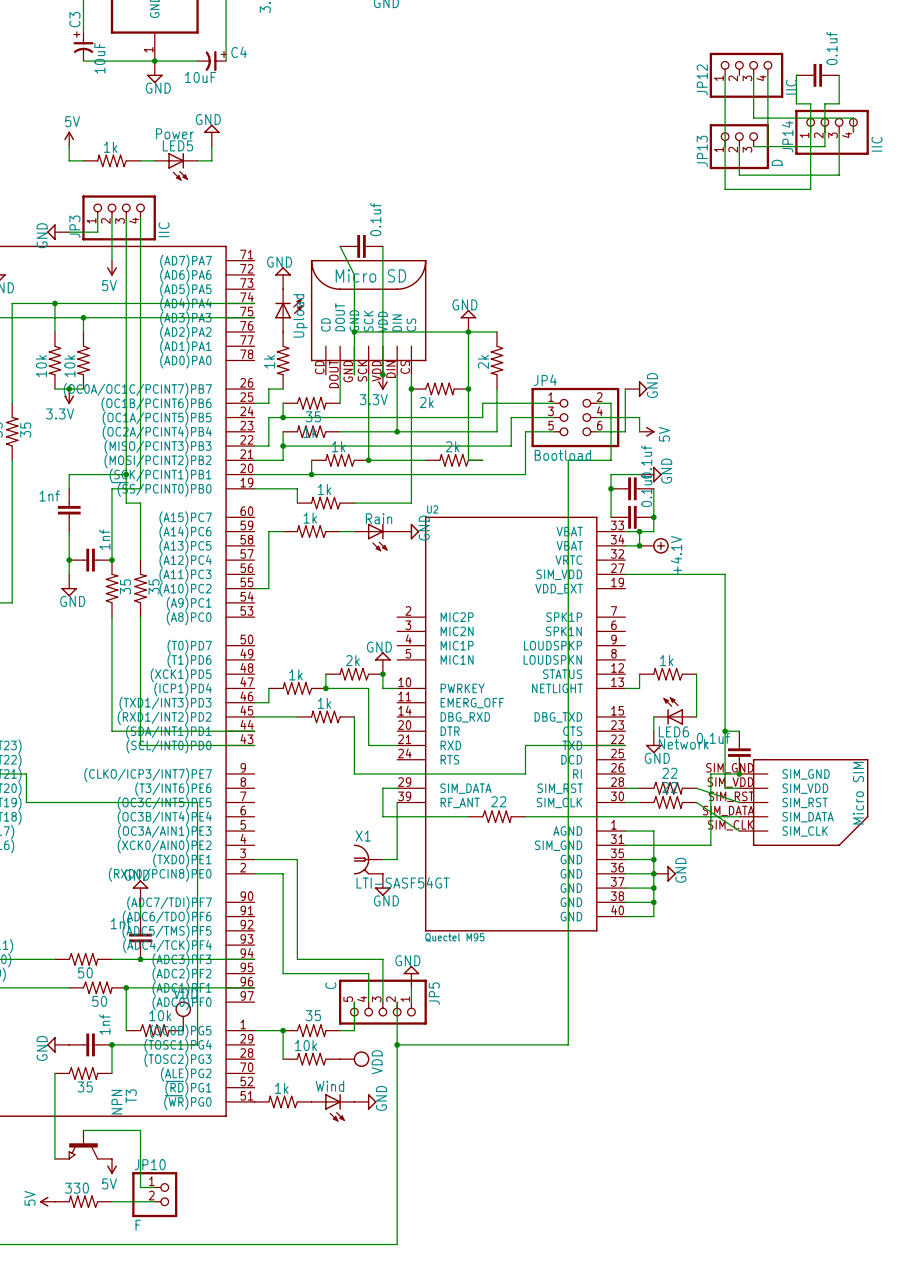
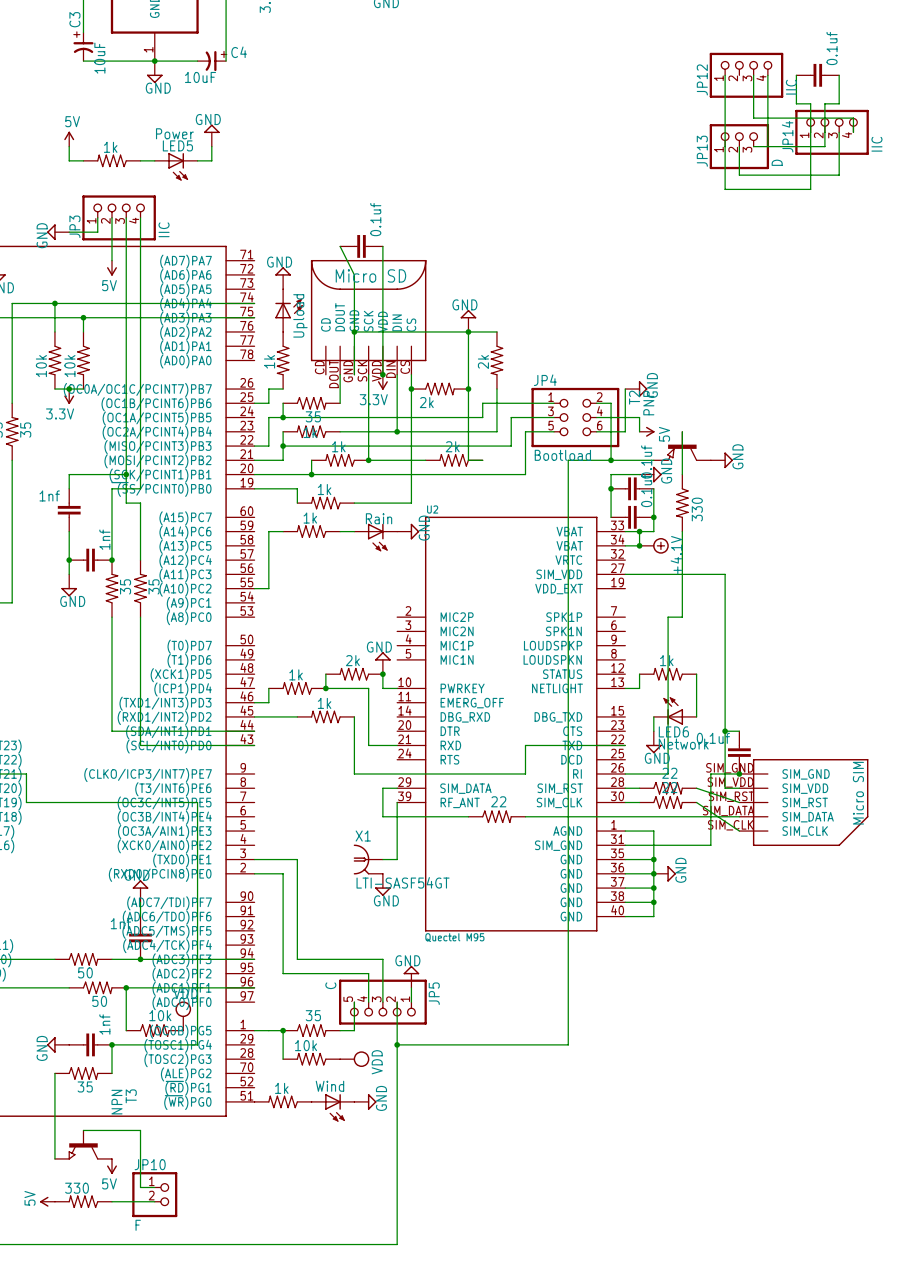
wire: none -> (682, 431) (682, 474)
T2: none -> PNP (682, 446)
wire: none -> (611, 460) (653, 460)
junction: none -> (611, 460)
power symbol: none -> GND (721, 460)
part: none -> 330 (682, 503)
wire: none -> (682, 531) (682, 617) (668, 617) (668, 773) (625, 773)

